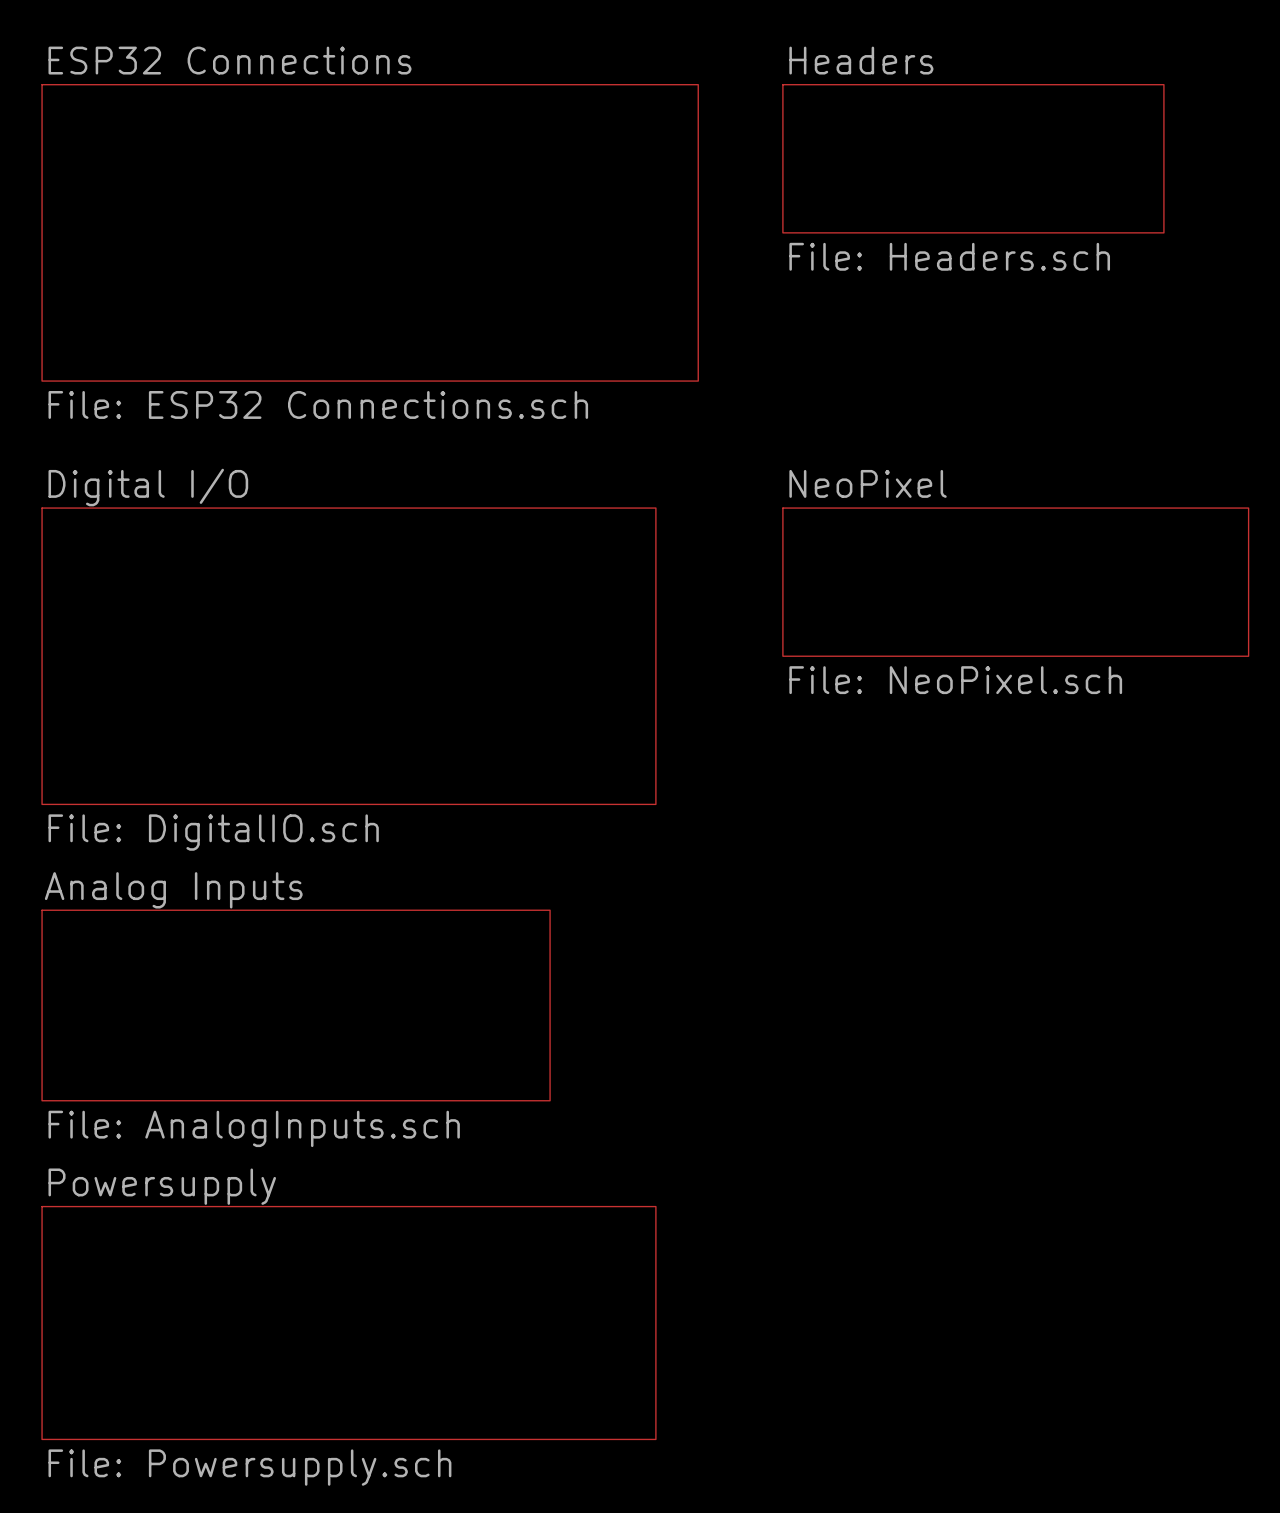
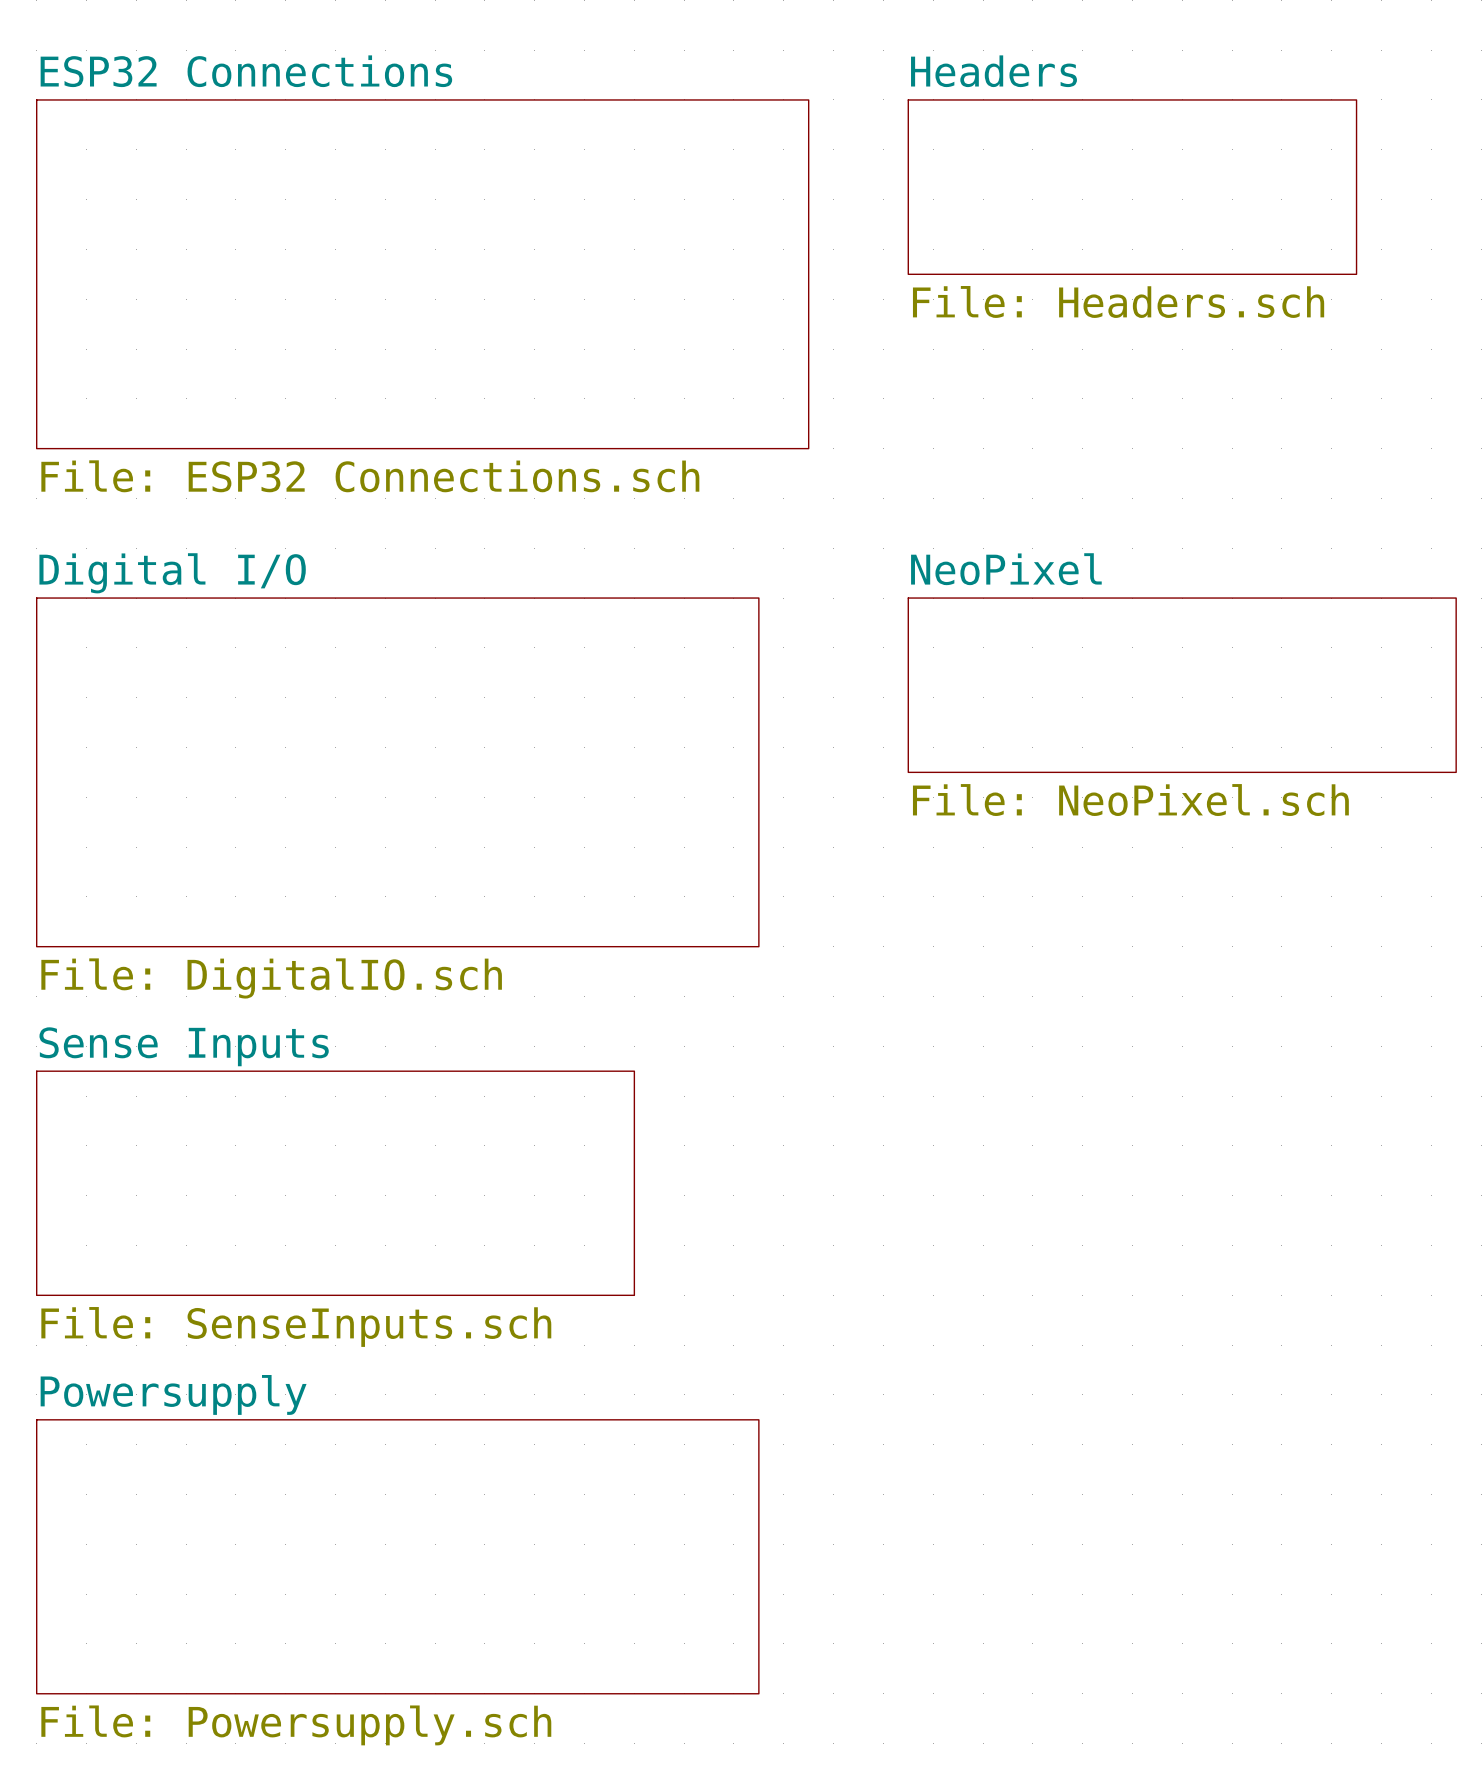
sheet Analog Inputs name: Analog Inputs (173, 890) -> Sense Inputs (184, 1046)
sheet Analog Inputs value: File: AnalogInputs.sch (254, 1128) -> File: SenseInputs.sch (296, 1326)

